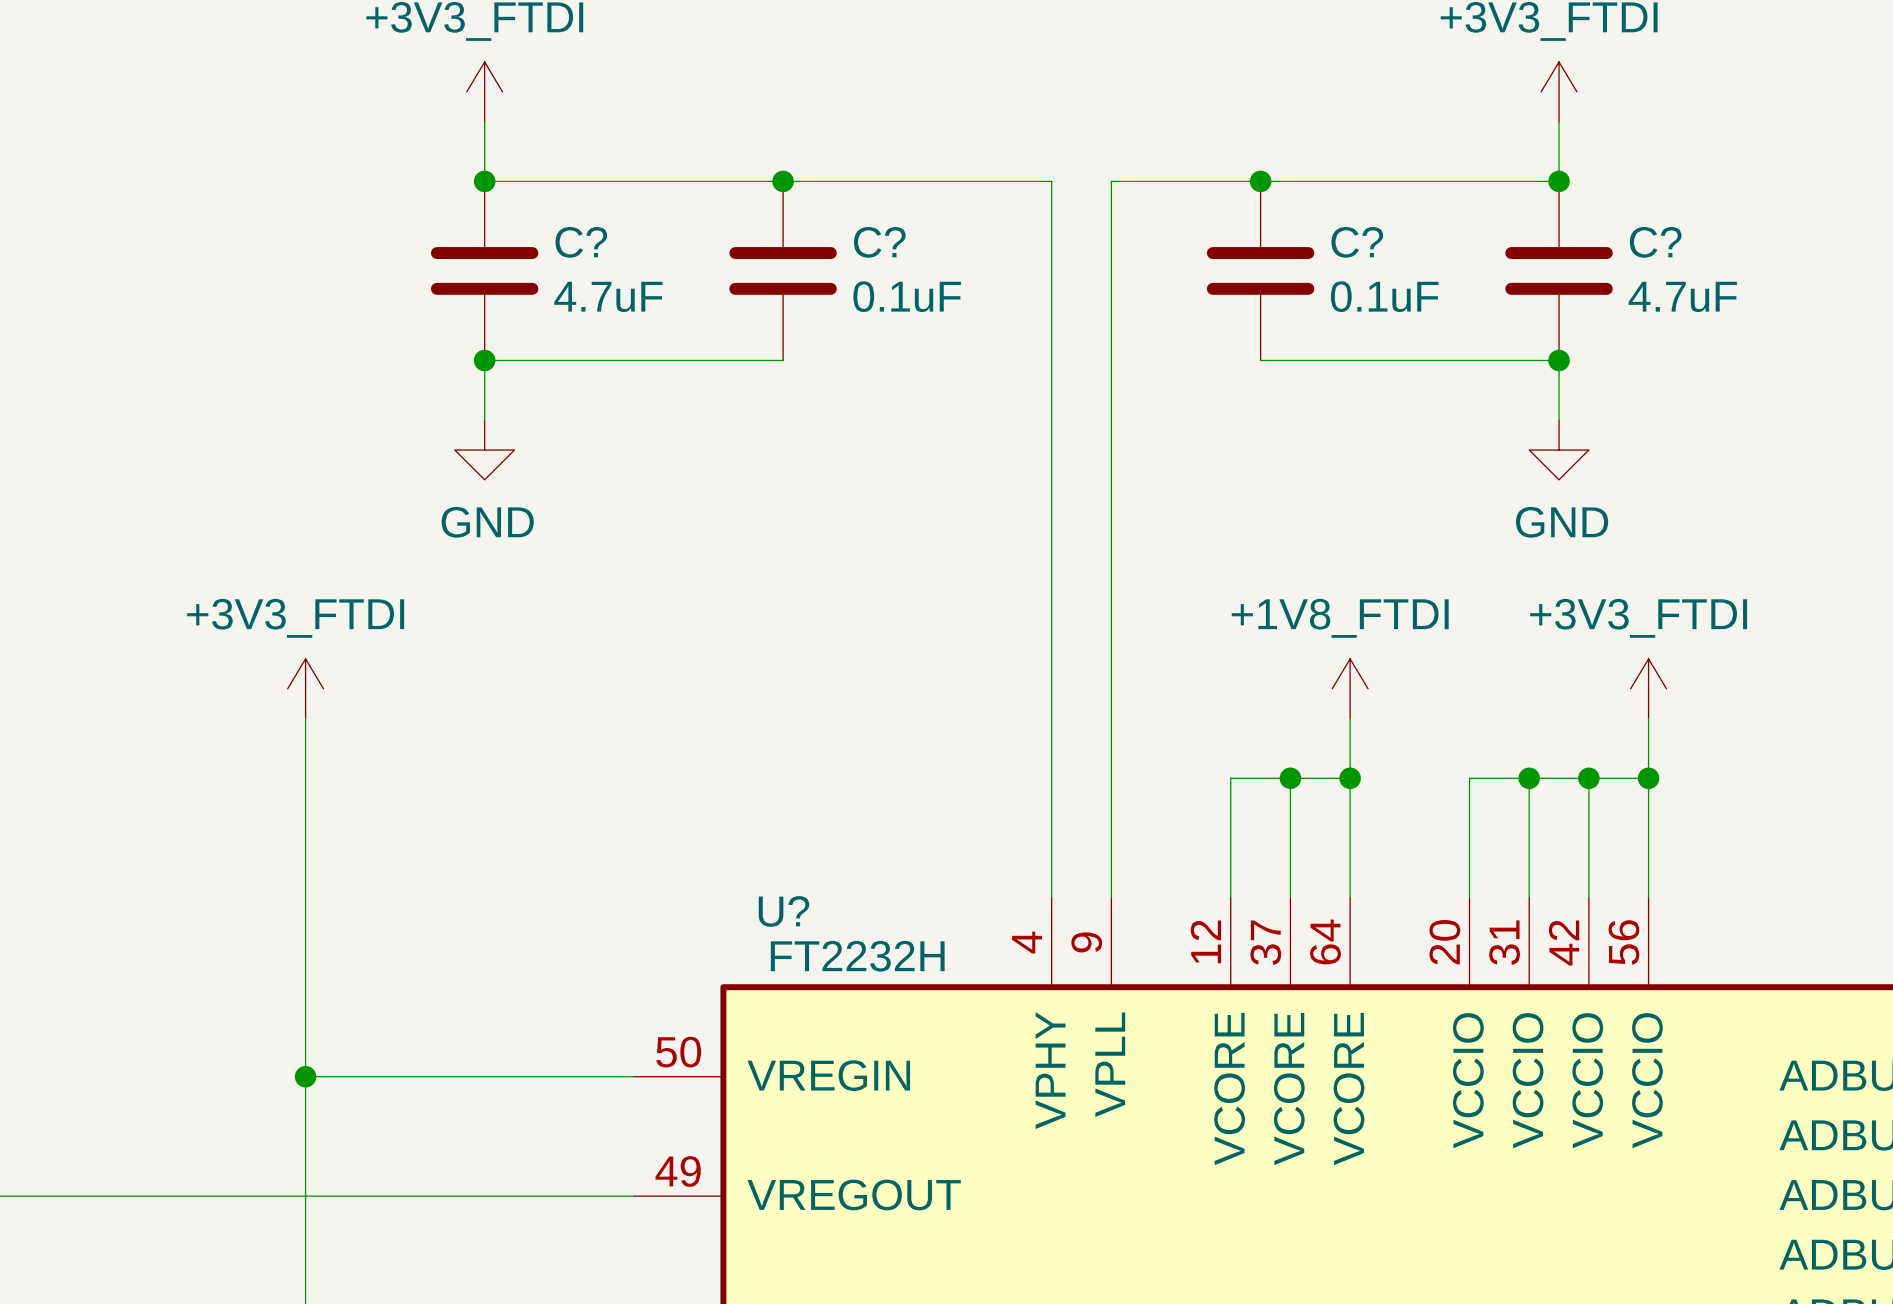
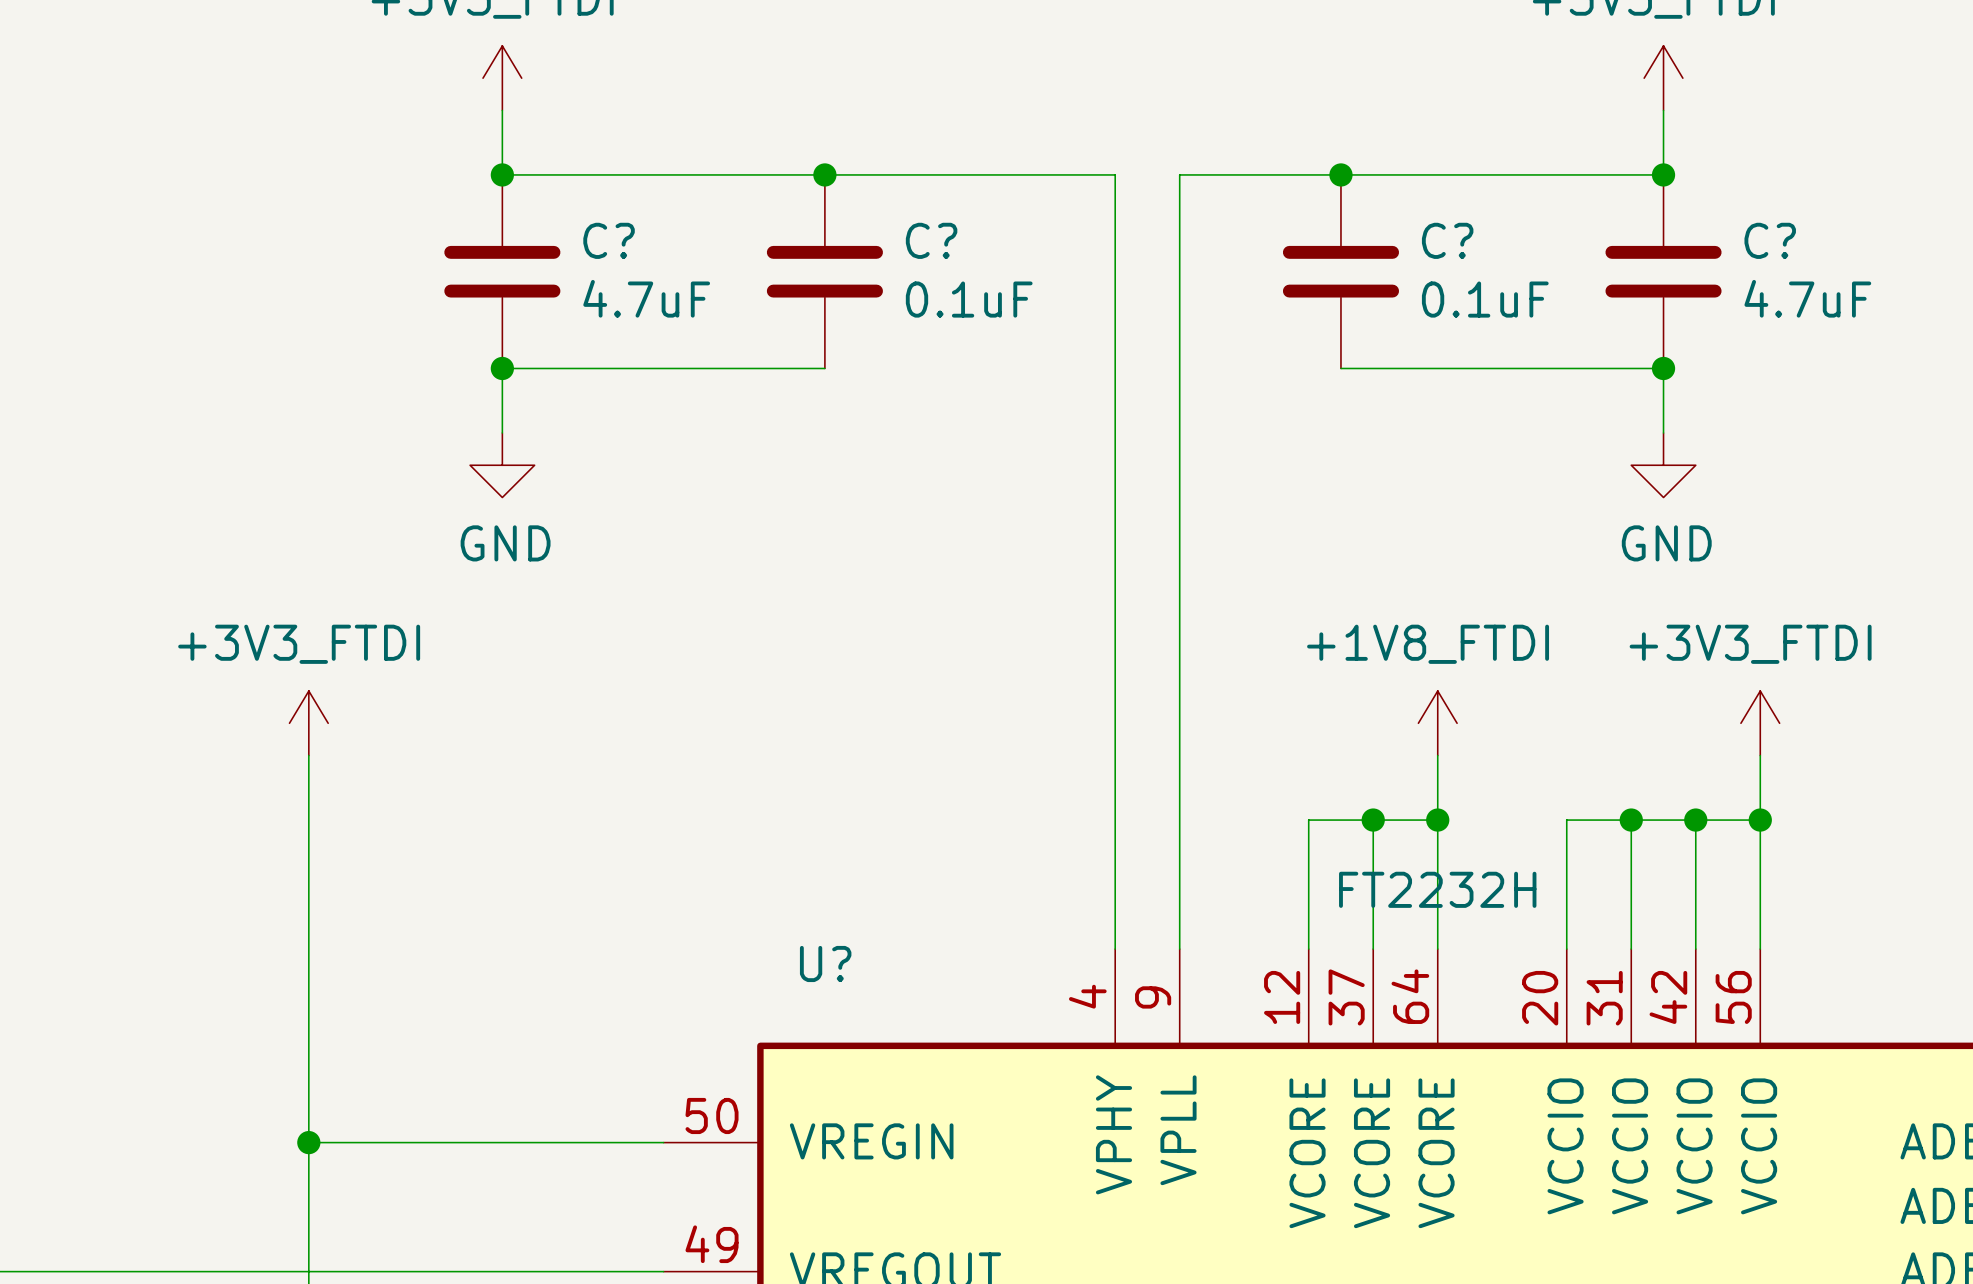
U? value position: FT2232H (857, 956) -> FT2232H (1437, 889)

